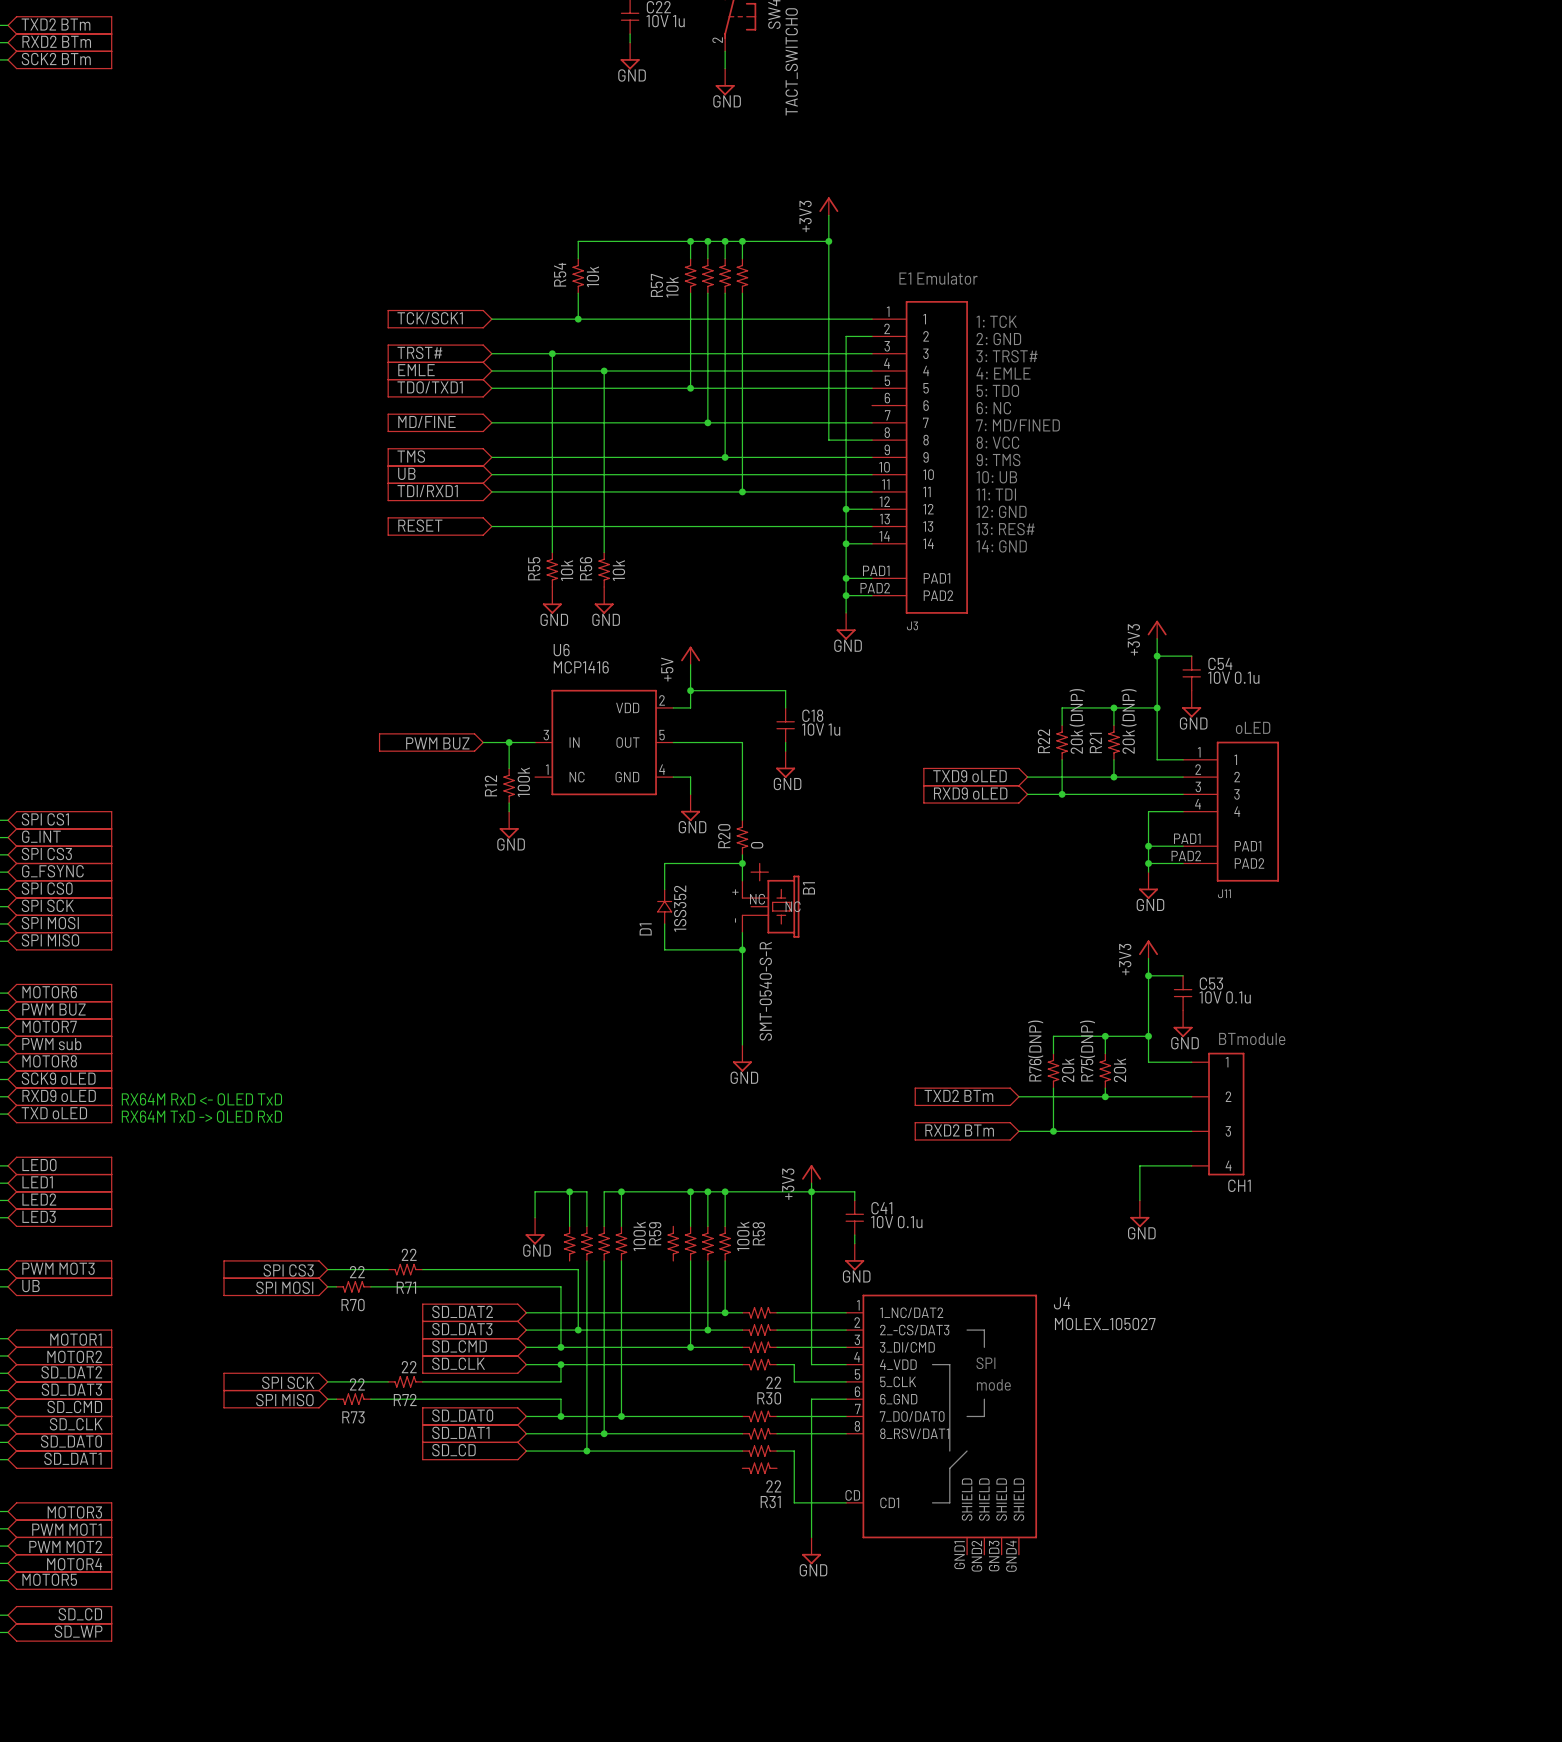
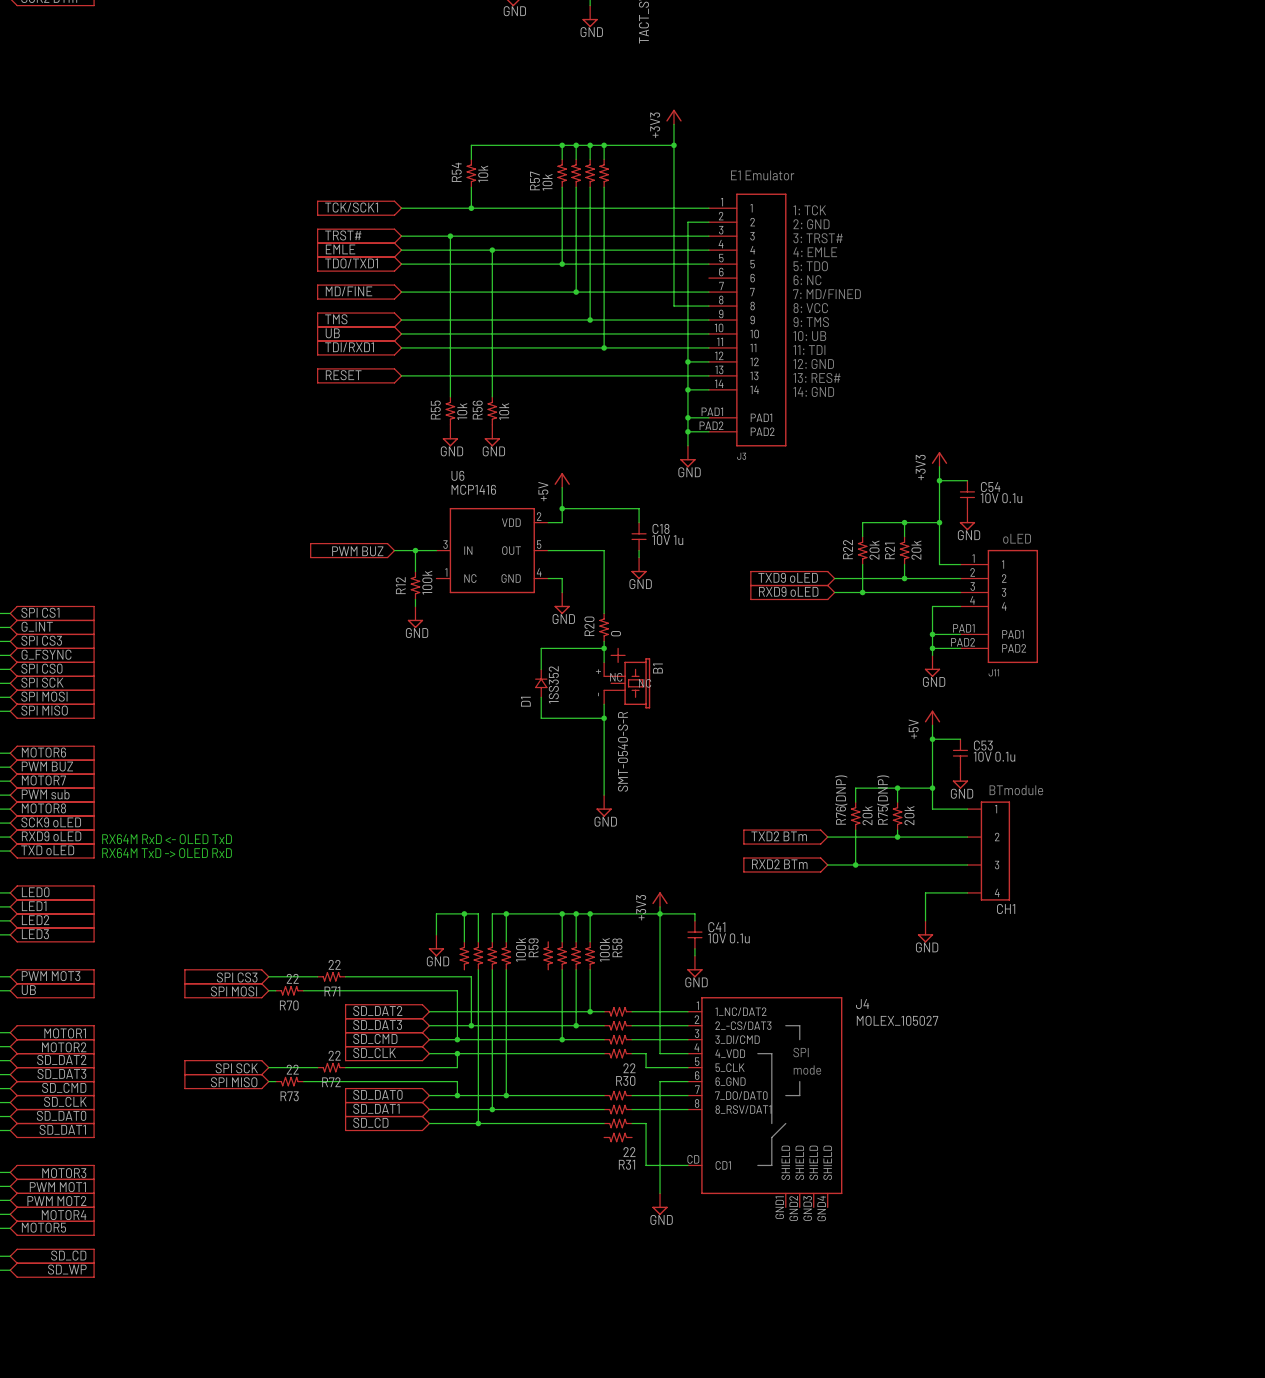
R22 value: 20k (DNP) (1077, 721) -> 20k (874, 550)
R21 value: 20k (DNP) (1129, 721) -> 20k (916, 550)
power symbol: +3V3 (1148, 949) -> +5V (932, 717)

